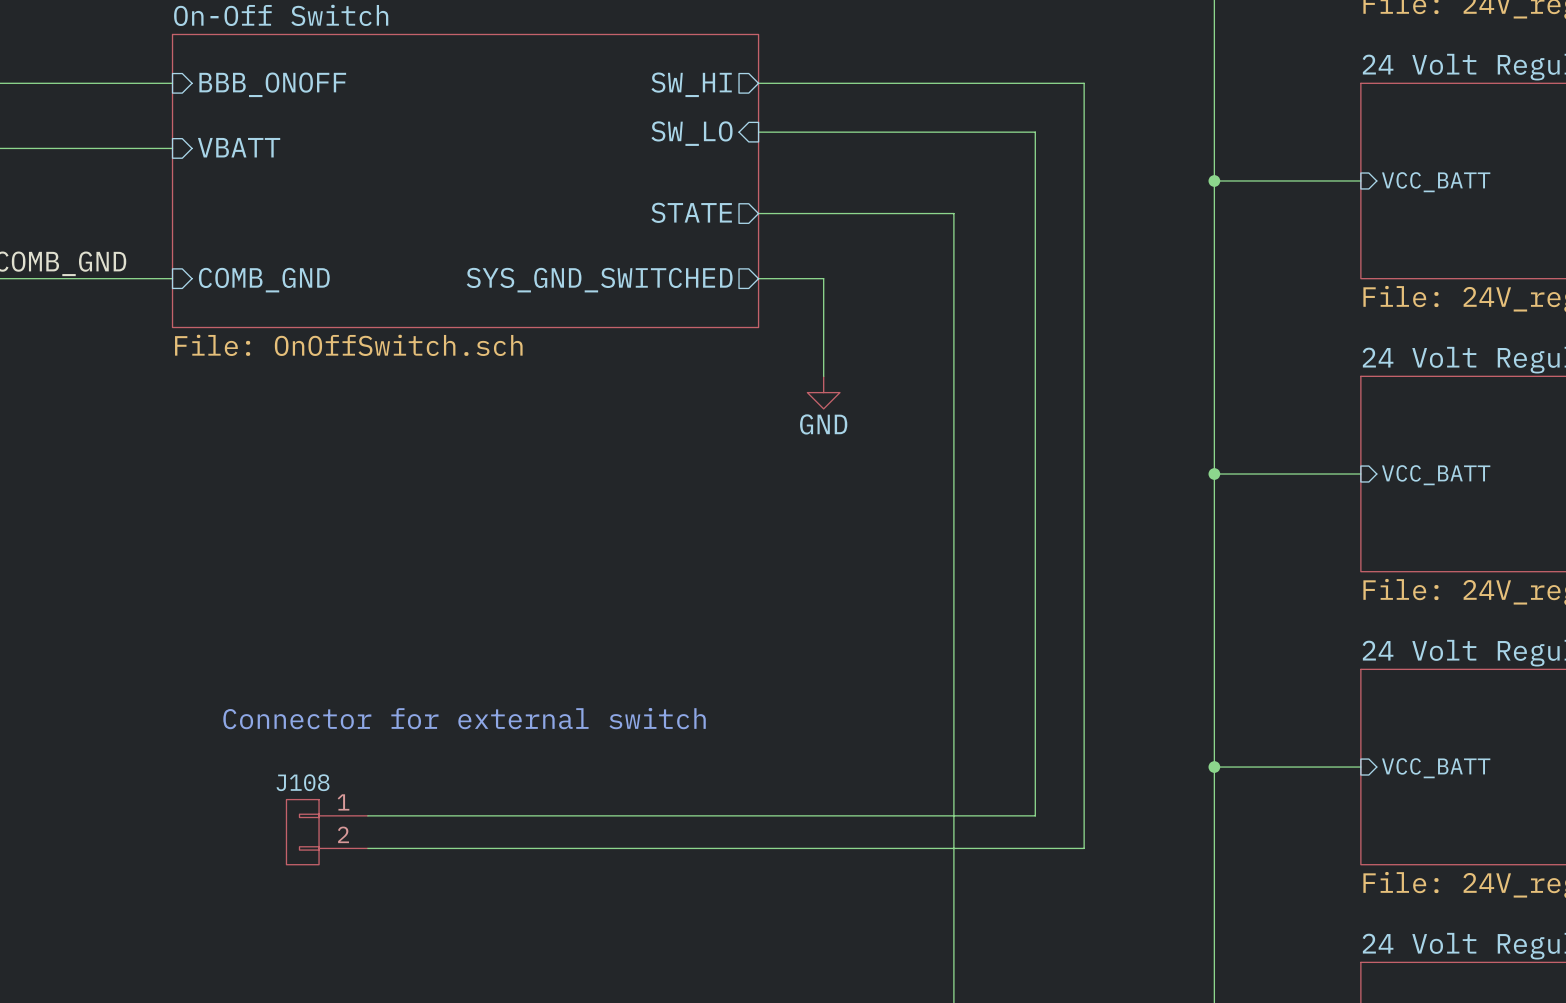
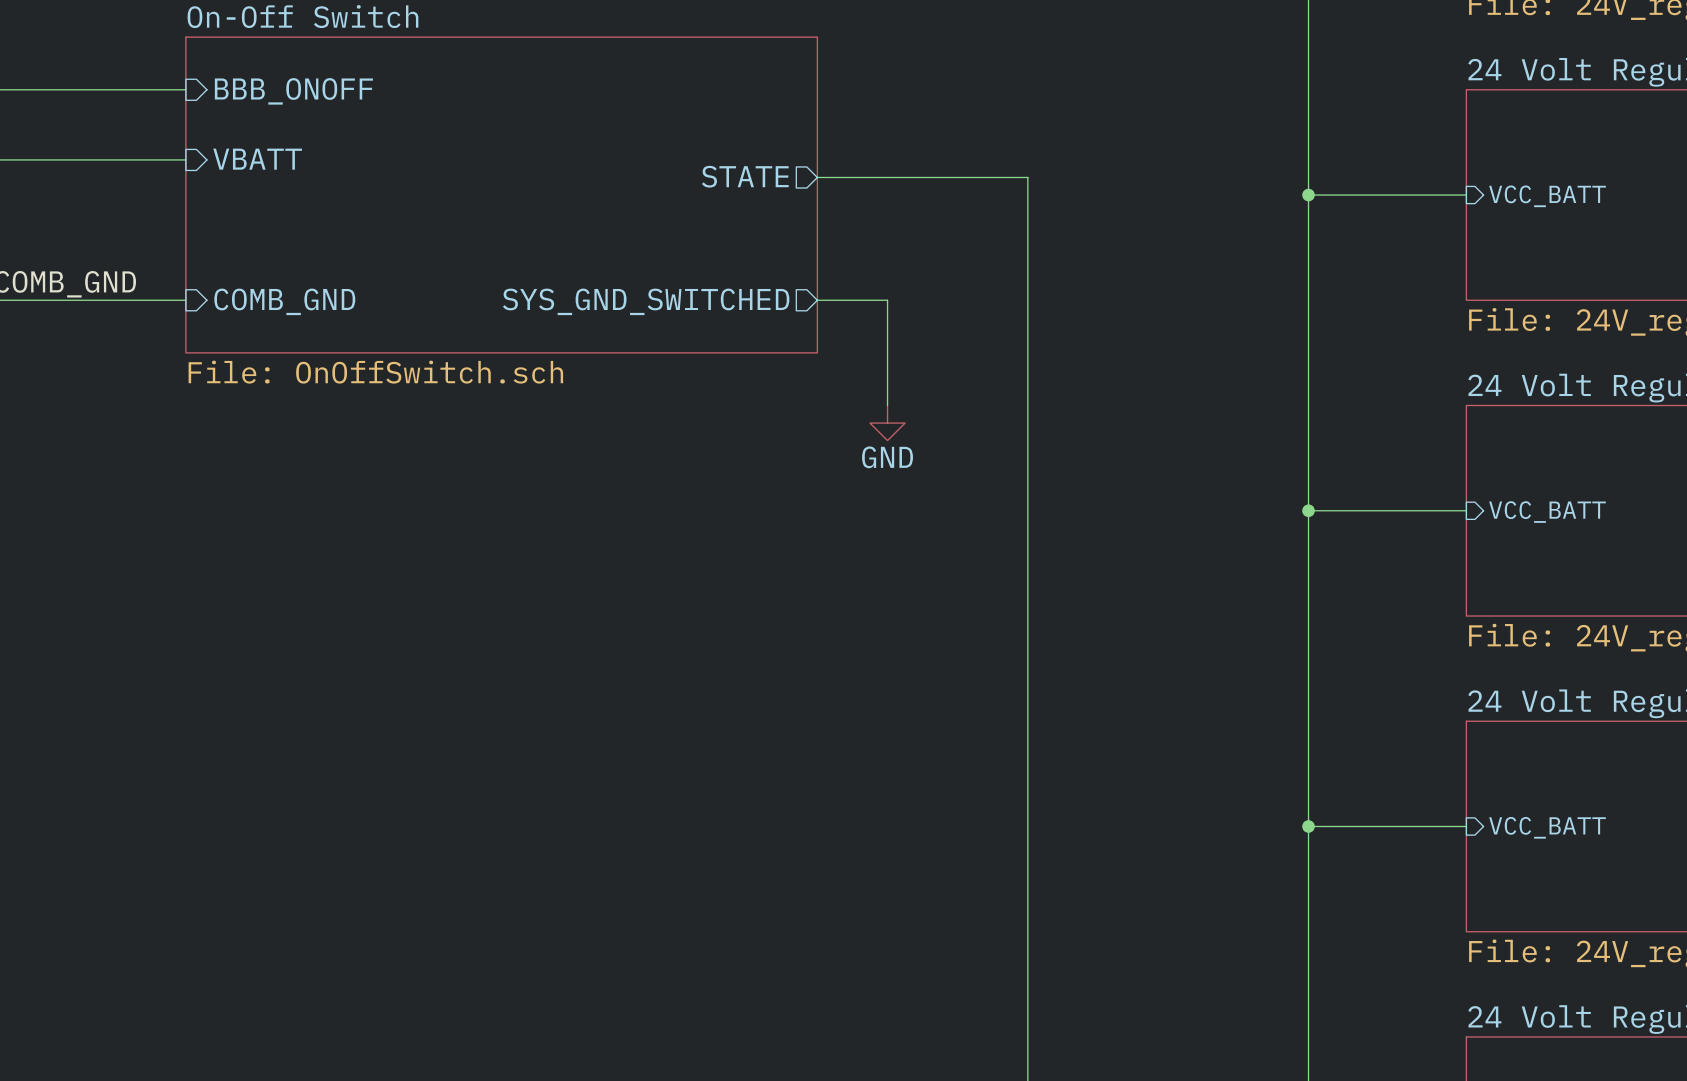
wire: (758, 83) (1084, 83) (1084, 848) (367, 848) -> none
sheet pin: SW_HI (691, 84) -> none
wire: (758, 132) (1035, 132) (1035, 815) (367, 815) -> none
sheet pin: SW_LO (692, 133) -> none
sheet pin position: STATE (691, 212) -> STATE (745, 176)
wire: (758, 213) (953, 213) -> (817, 177) (1027, 177) (1027, 230)
text: Connector for external switch (464, 718) -> none
J108: (327, 832) -> none

